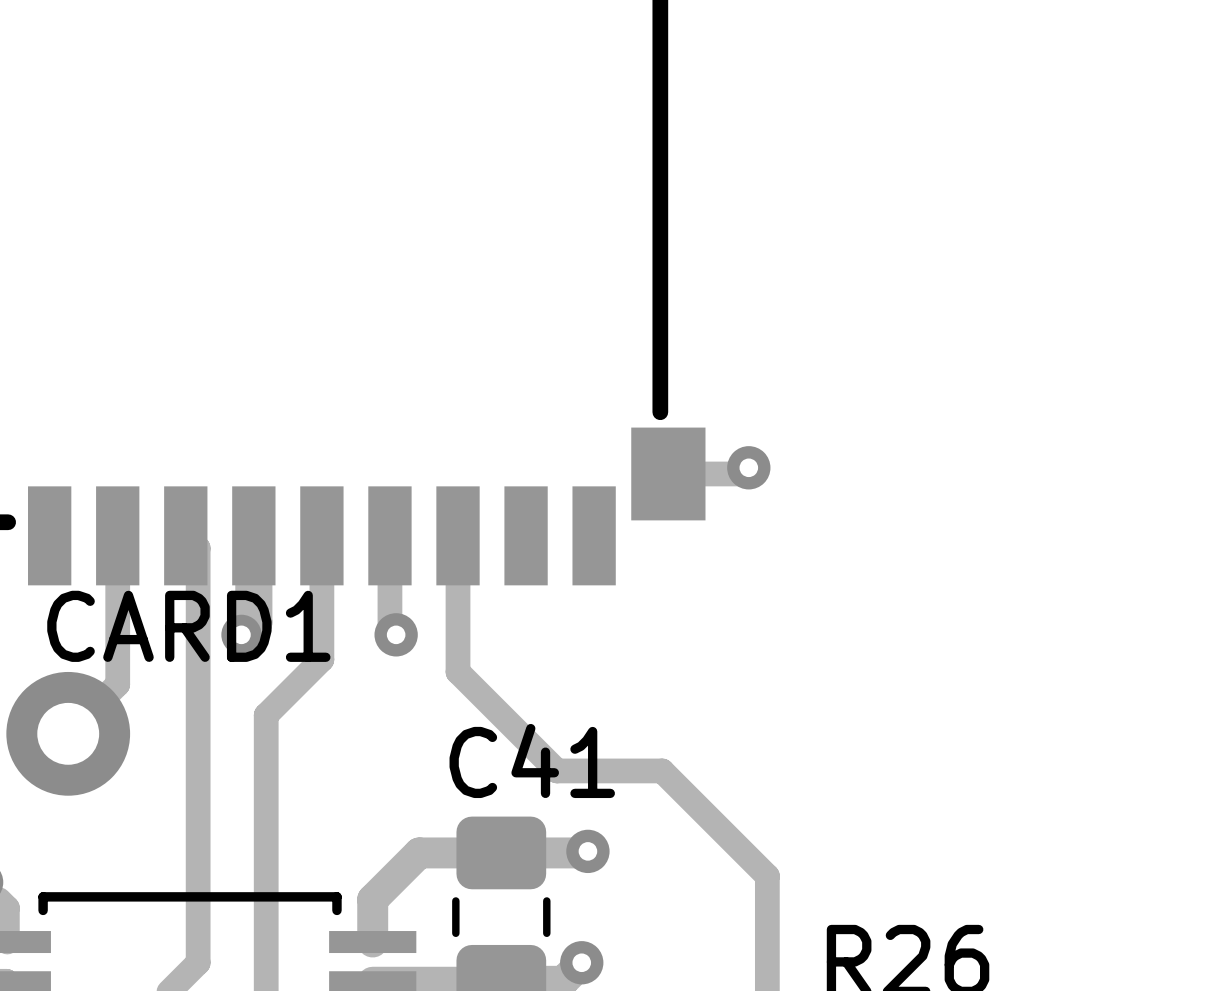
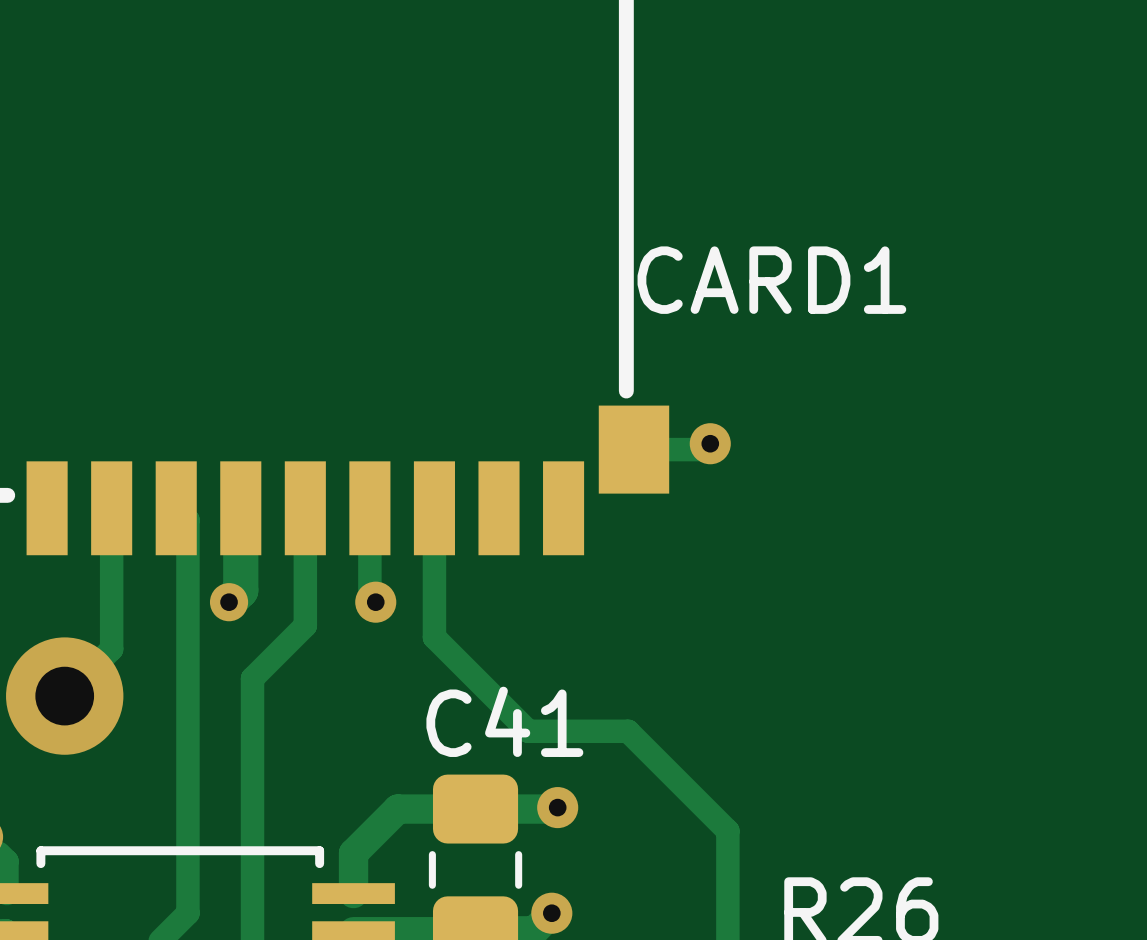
CARD1 name position: CARD1 (188, 626) -> CARD1 (771, 280)

